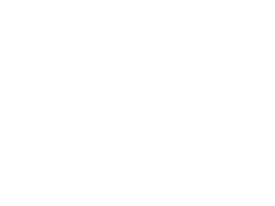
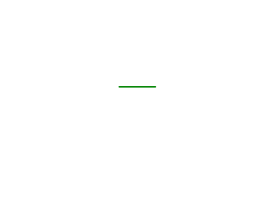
wire: none -> (119, 86) (155, 86)

